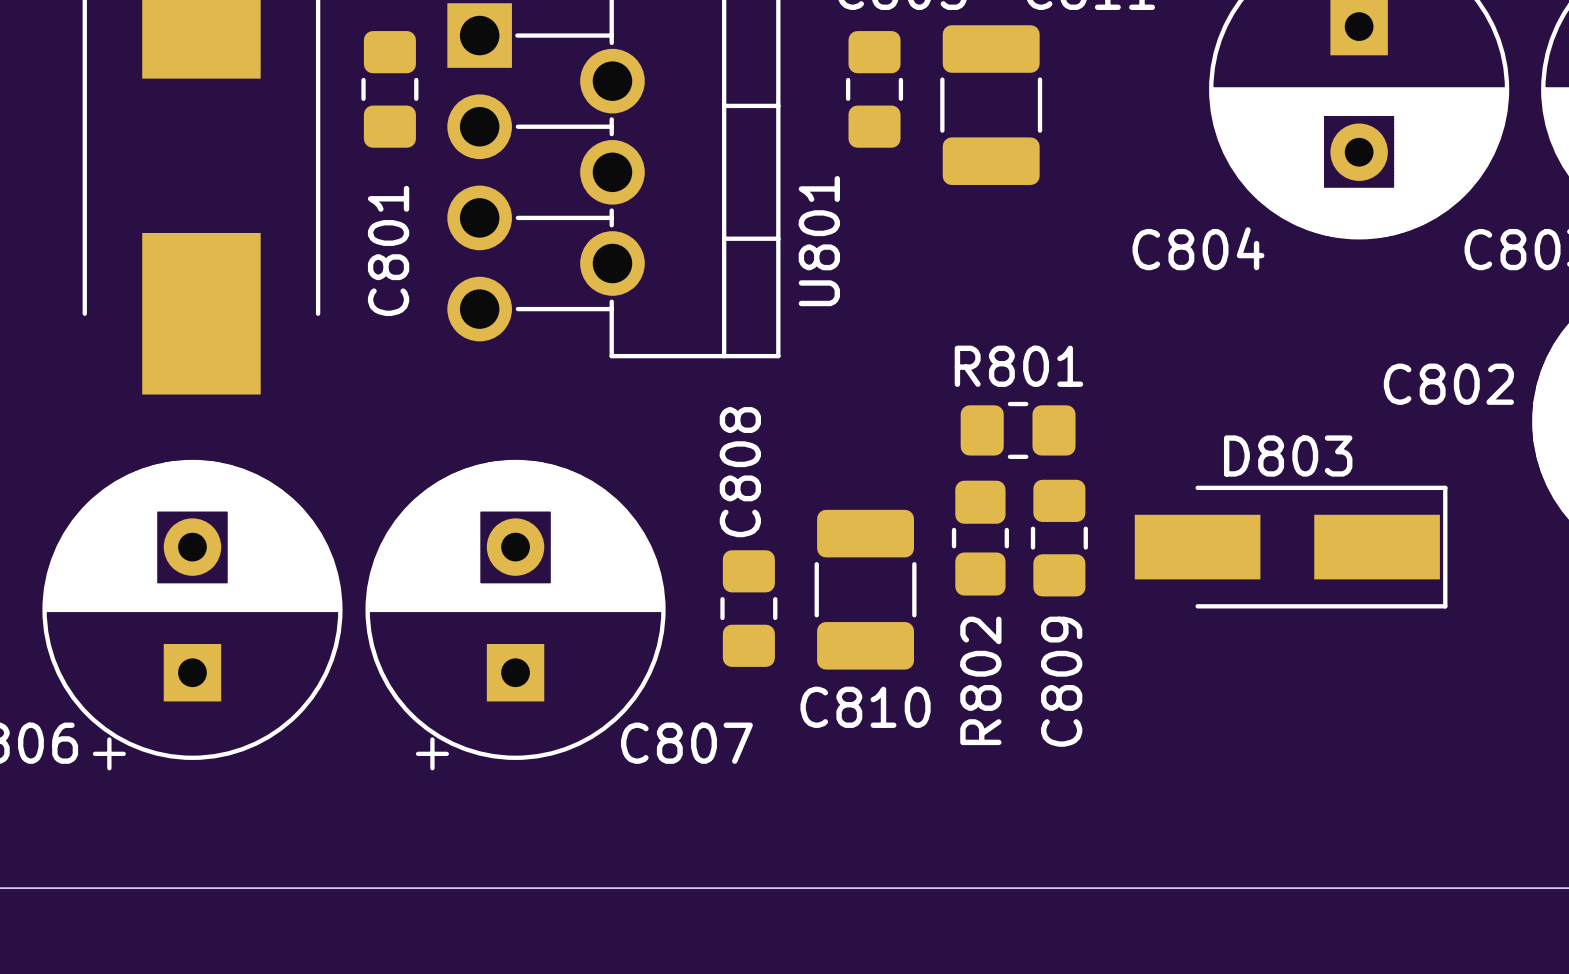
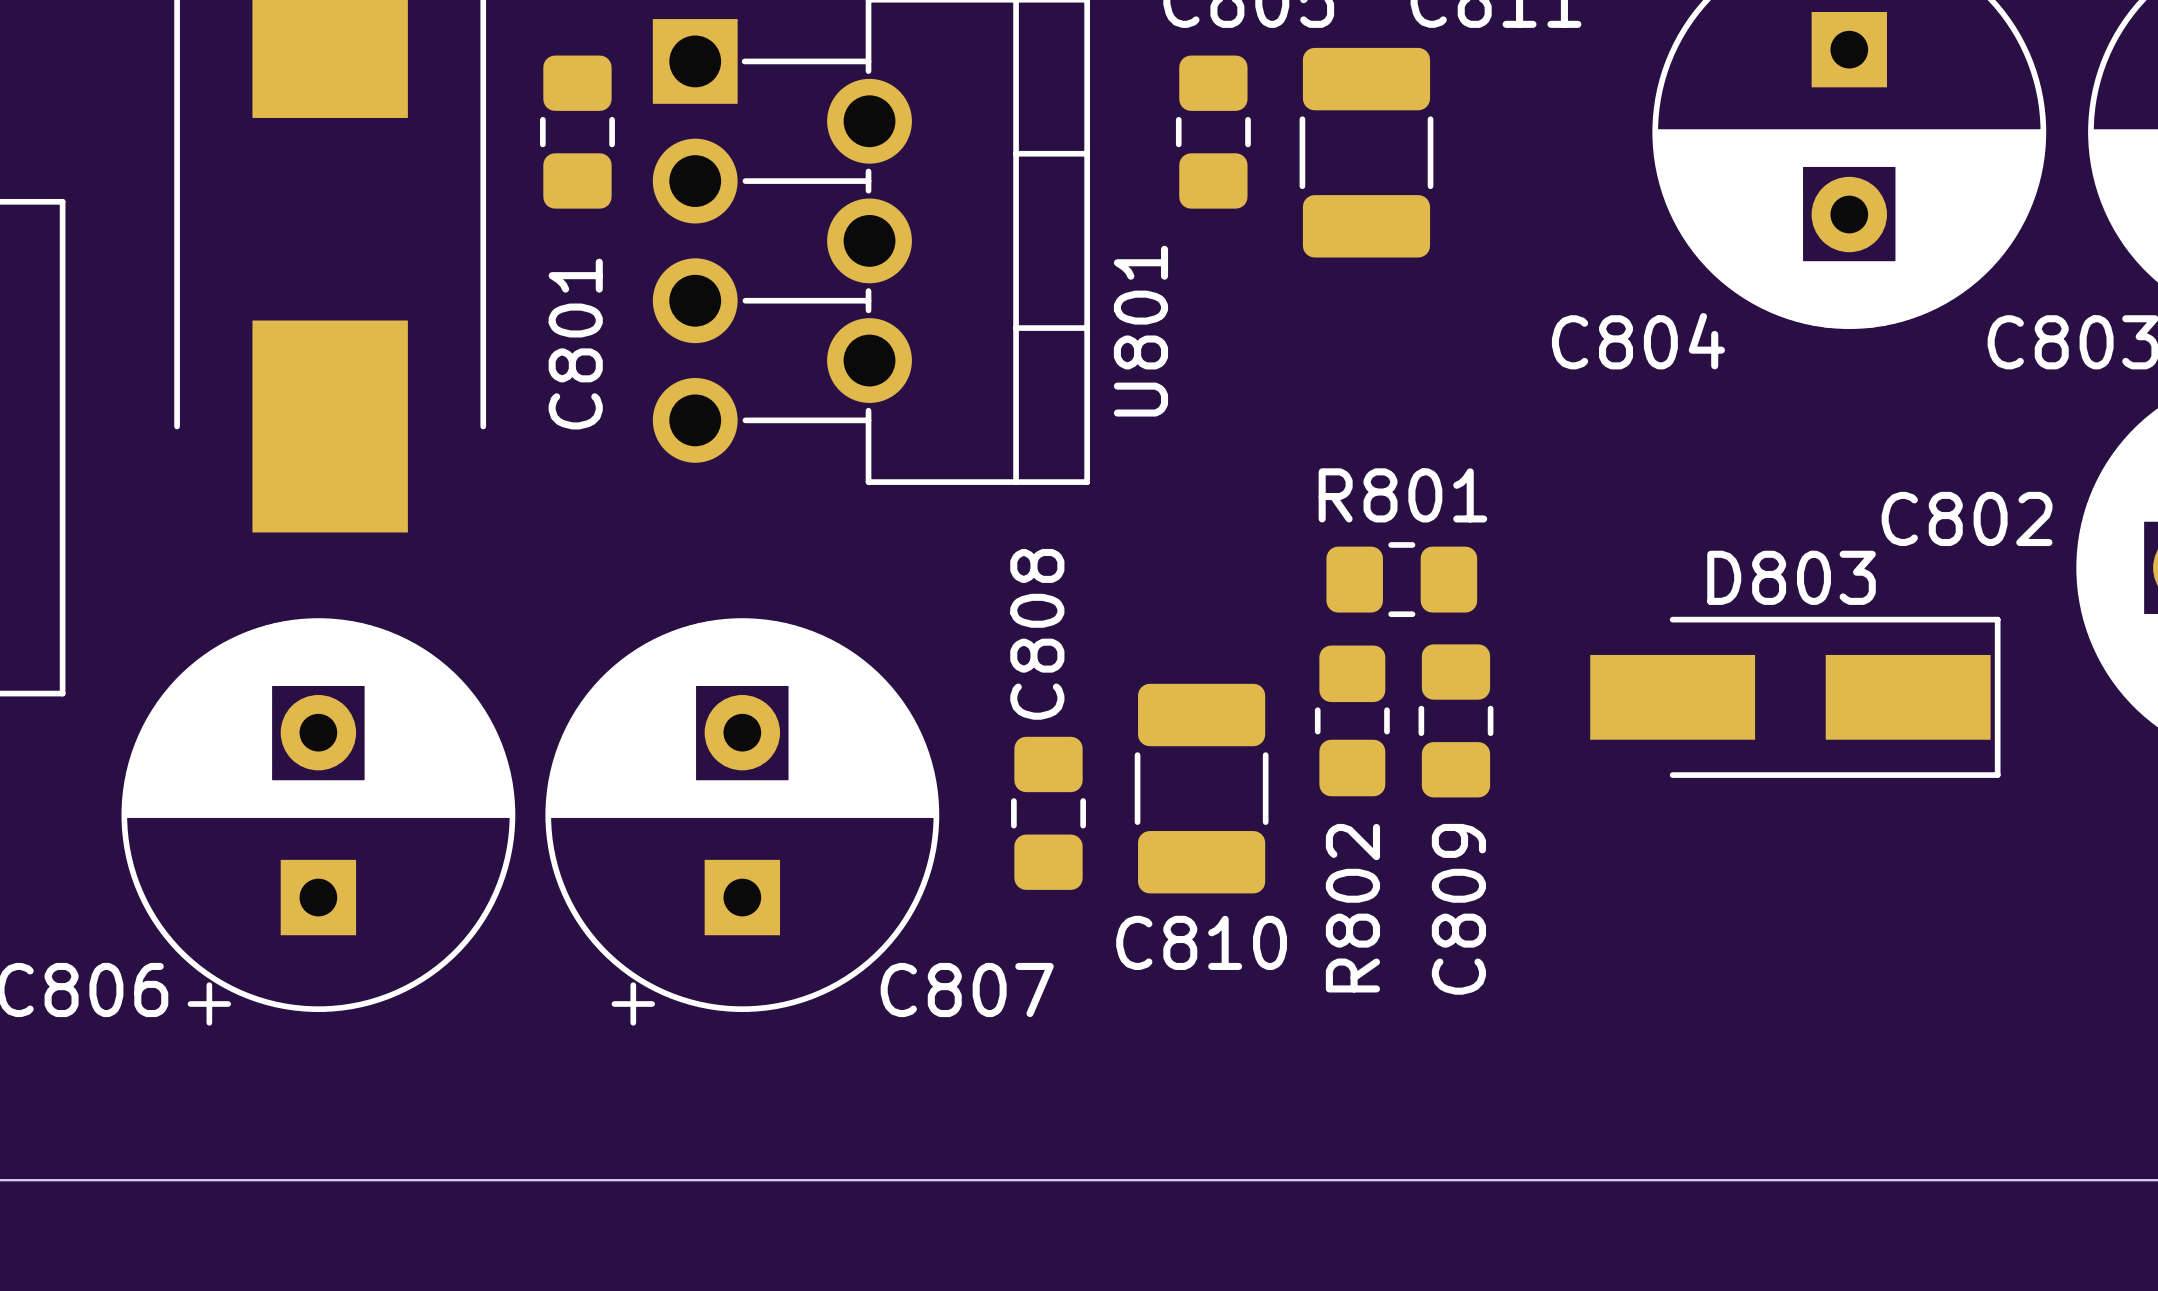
D803 position: (1291, 547) -> (1795, 697)

